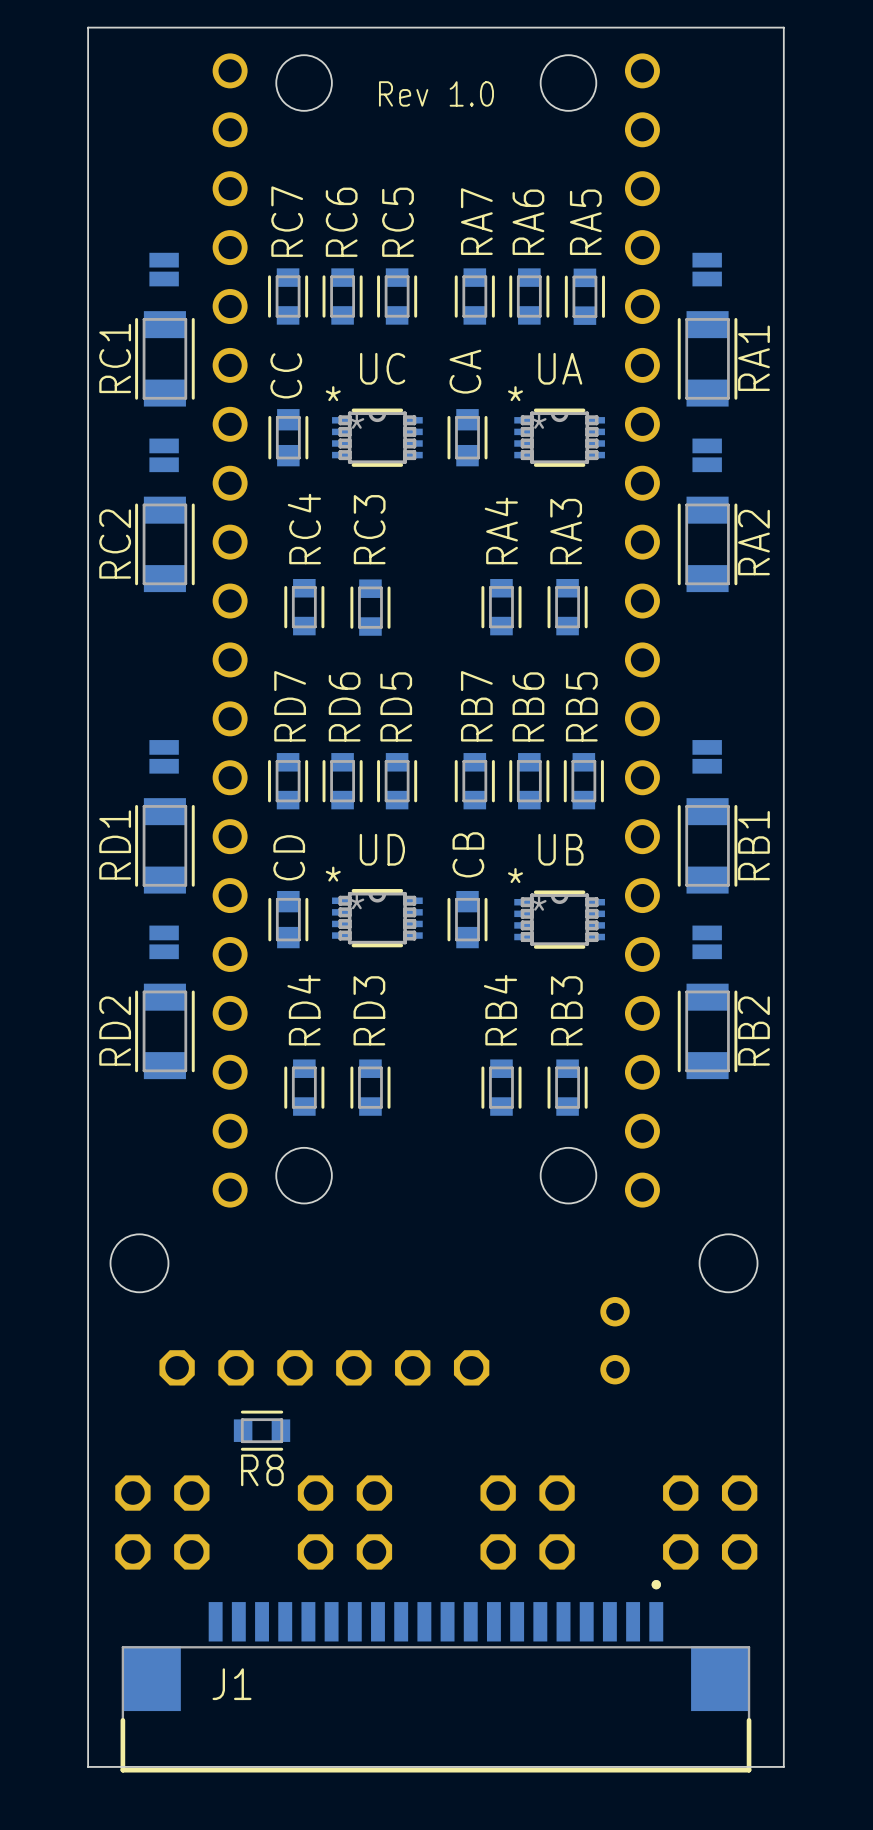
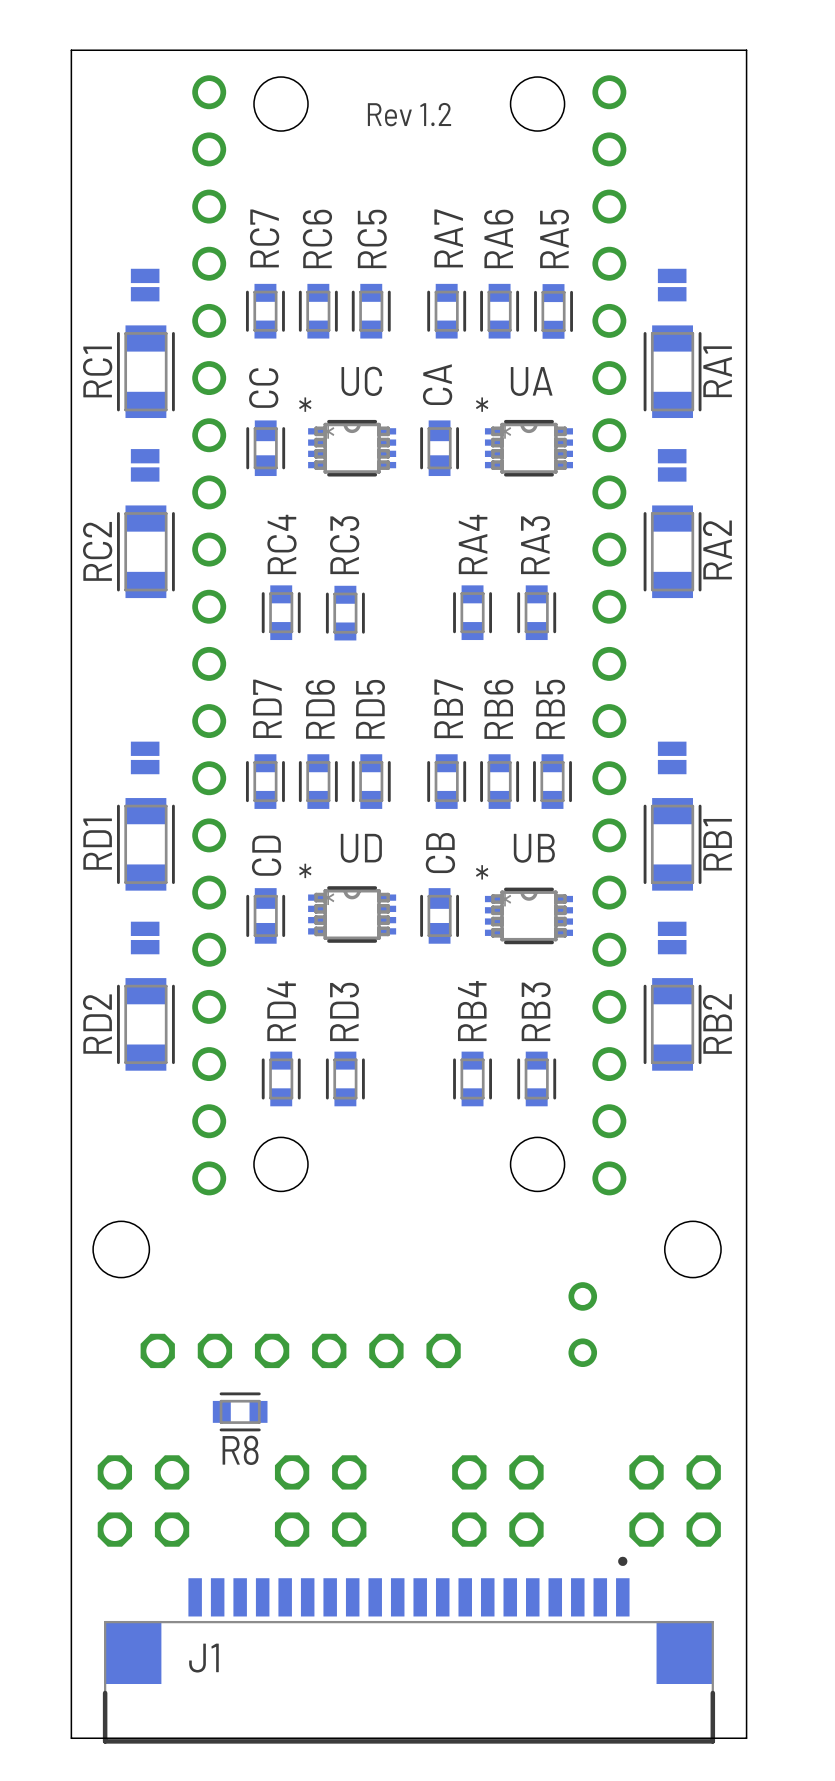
text: Rev 1.0 (436, 93) -> Rev 1.2 (409, 114)

